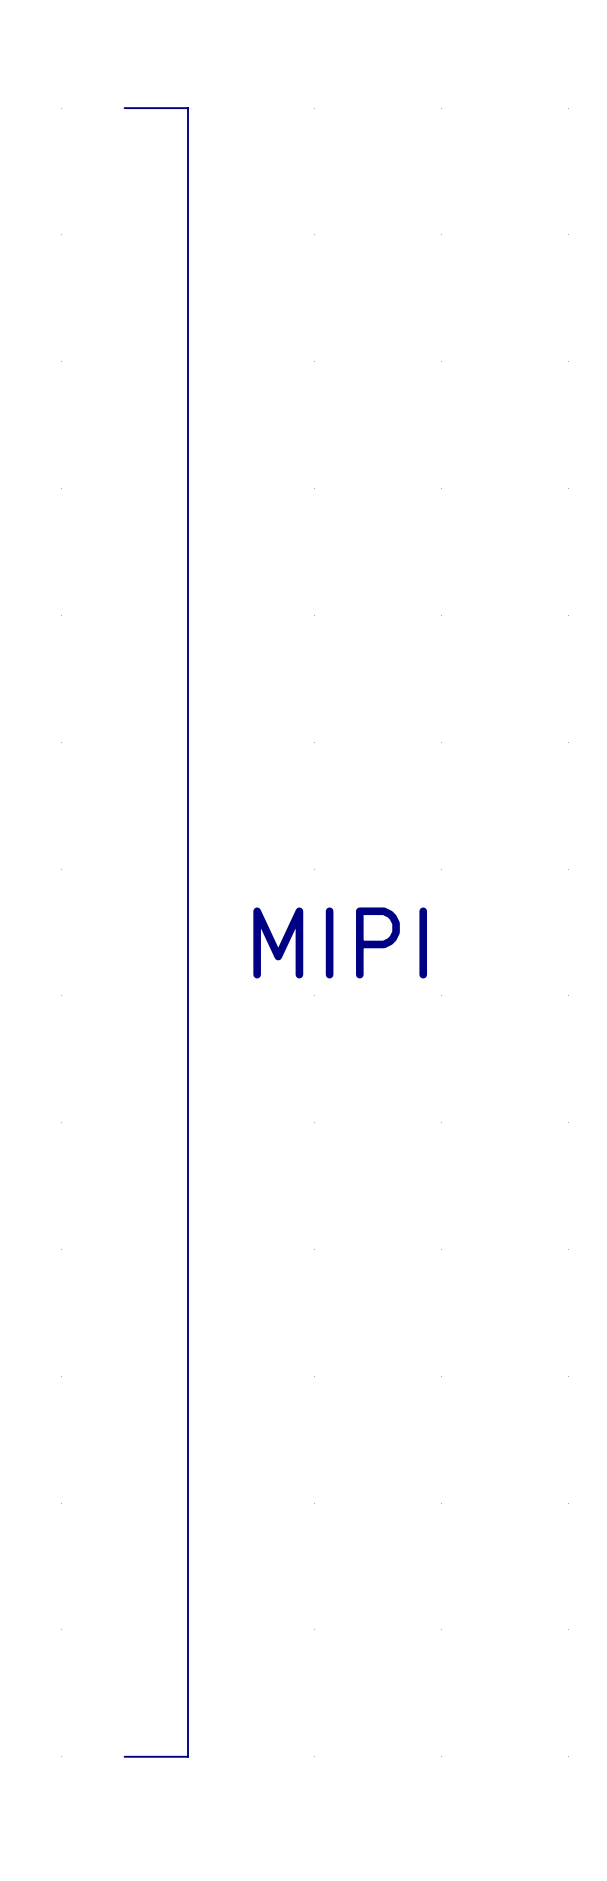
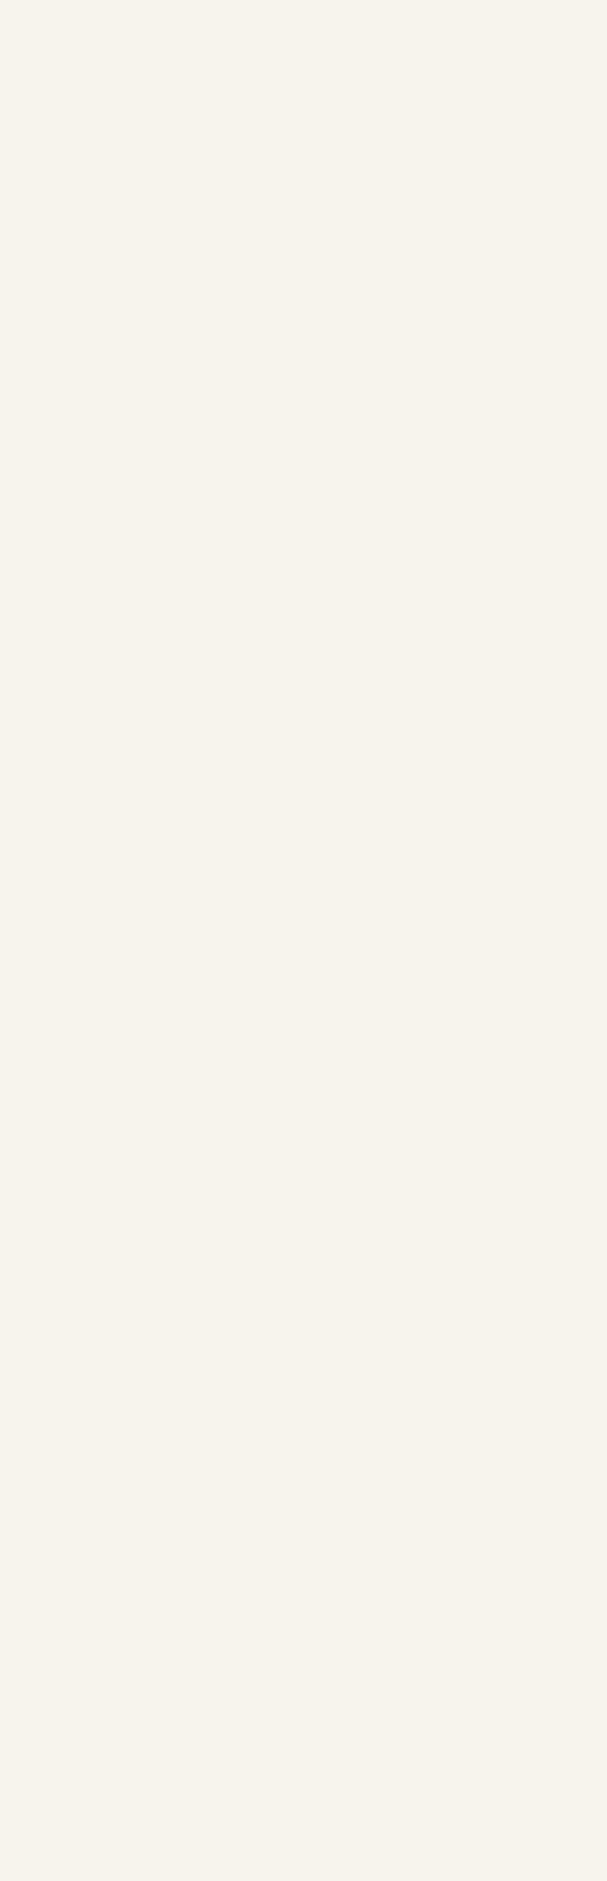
line: (124, 108) (188, 108) (188, 1756) (124, 1756) -> none
text: MIPI (340, 942) -> none

